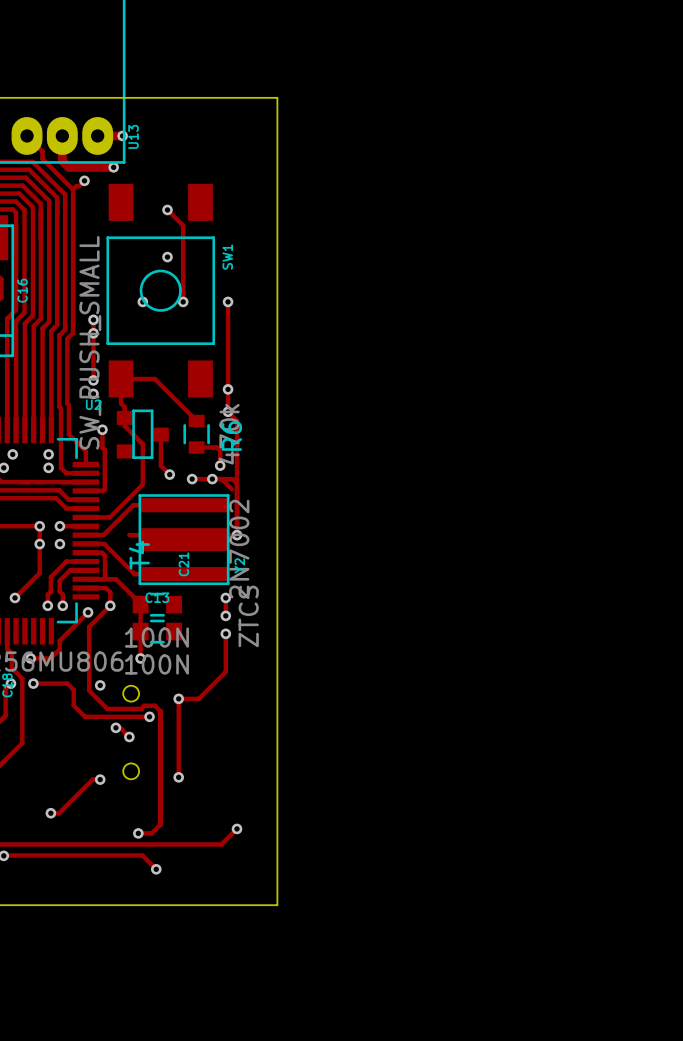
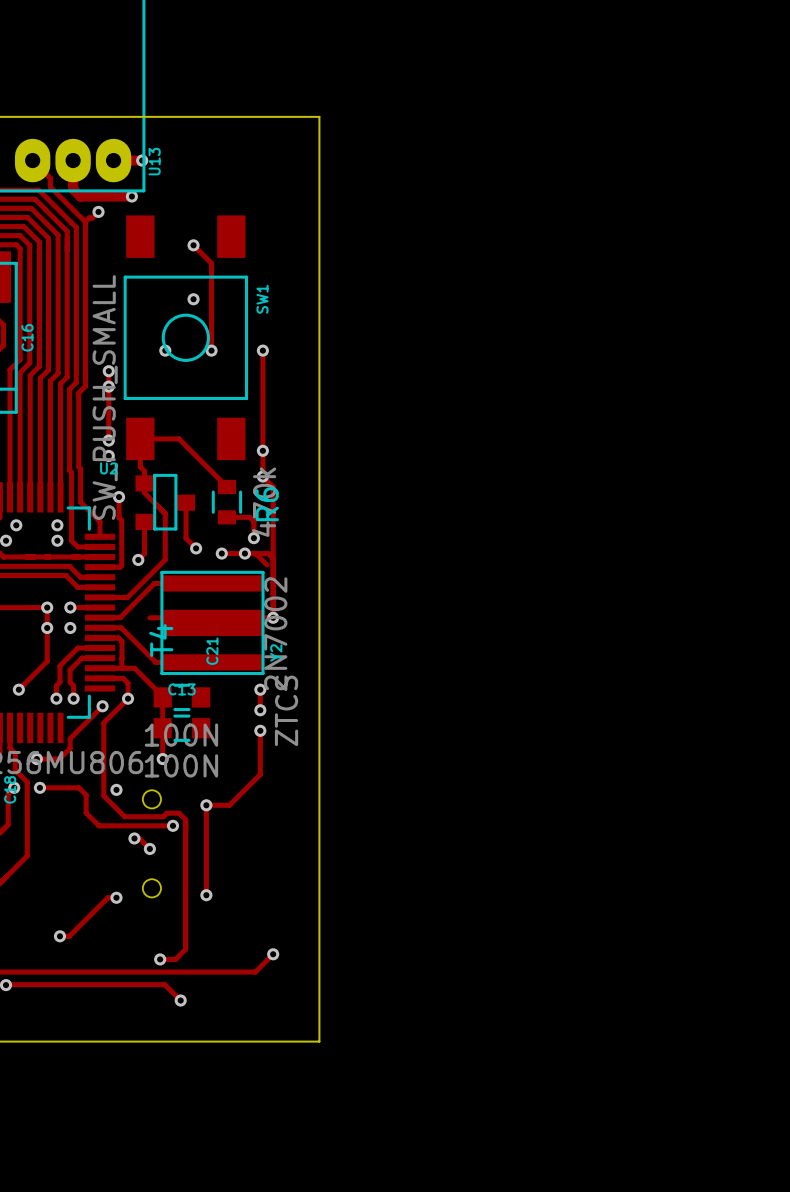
track: none -> (144, 521) (144, 553) (138, 559)
via: none -> (138, 559)

